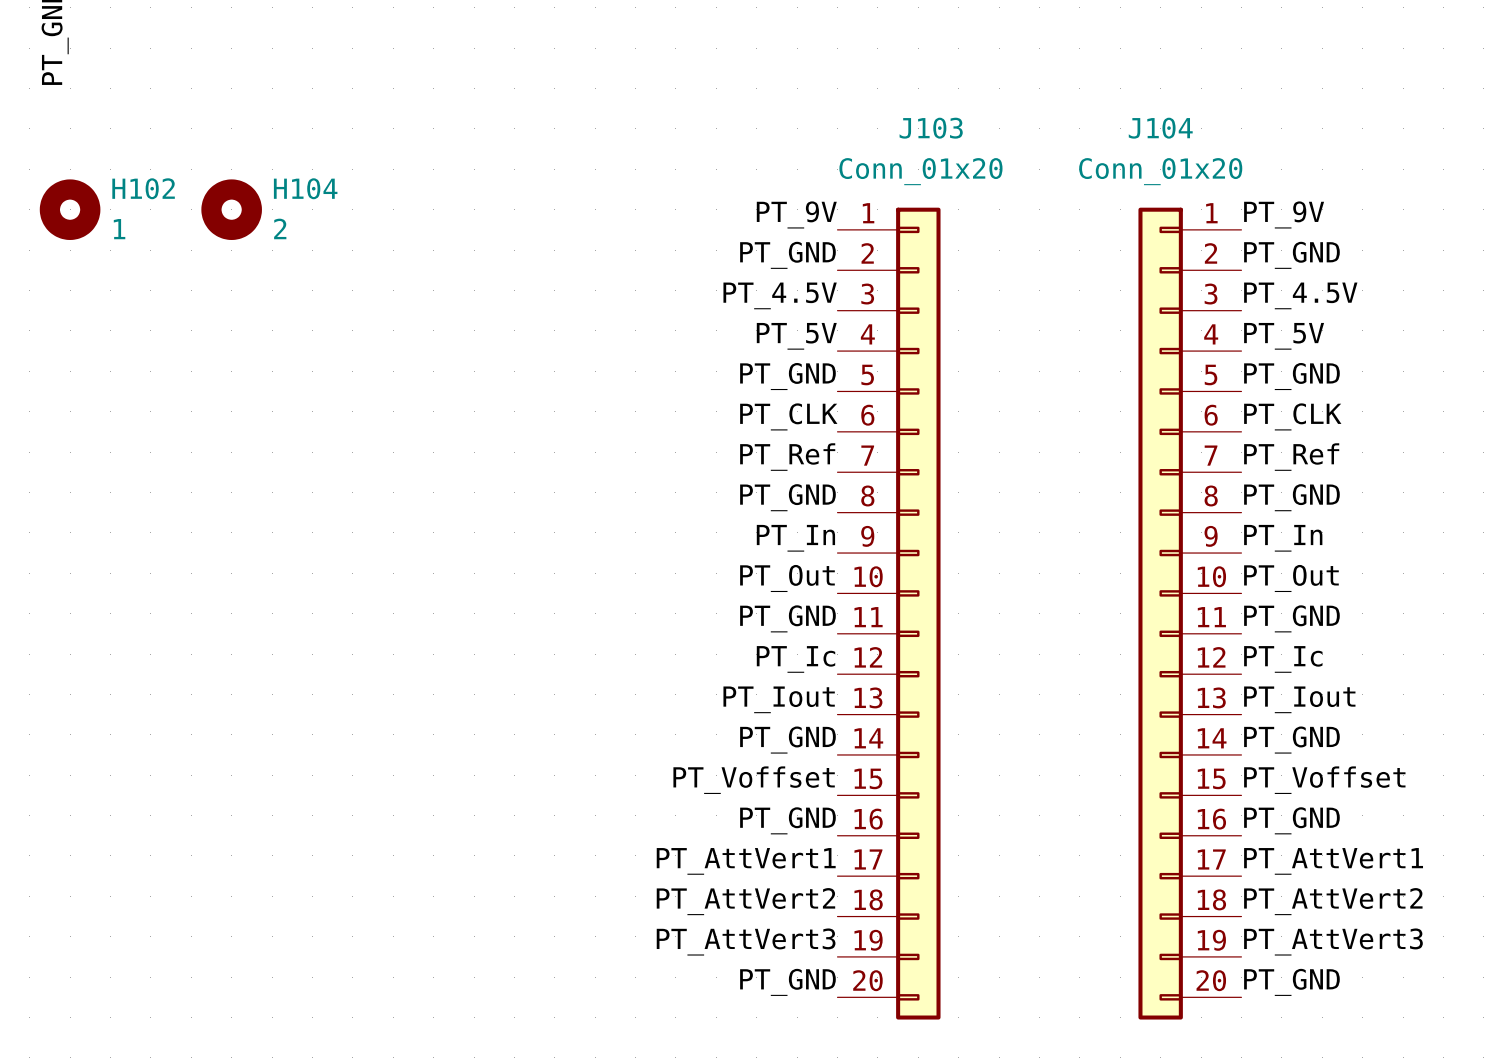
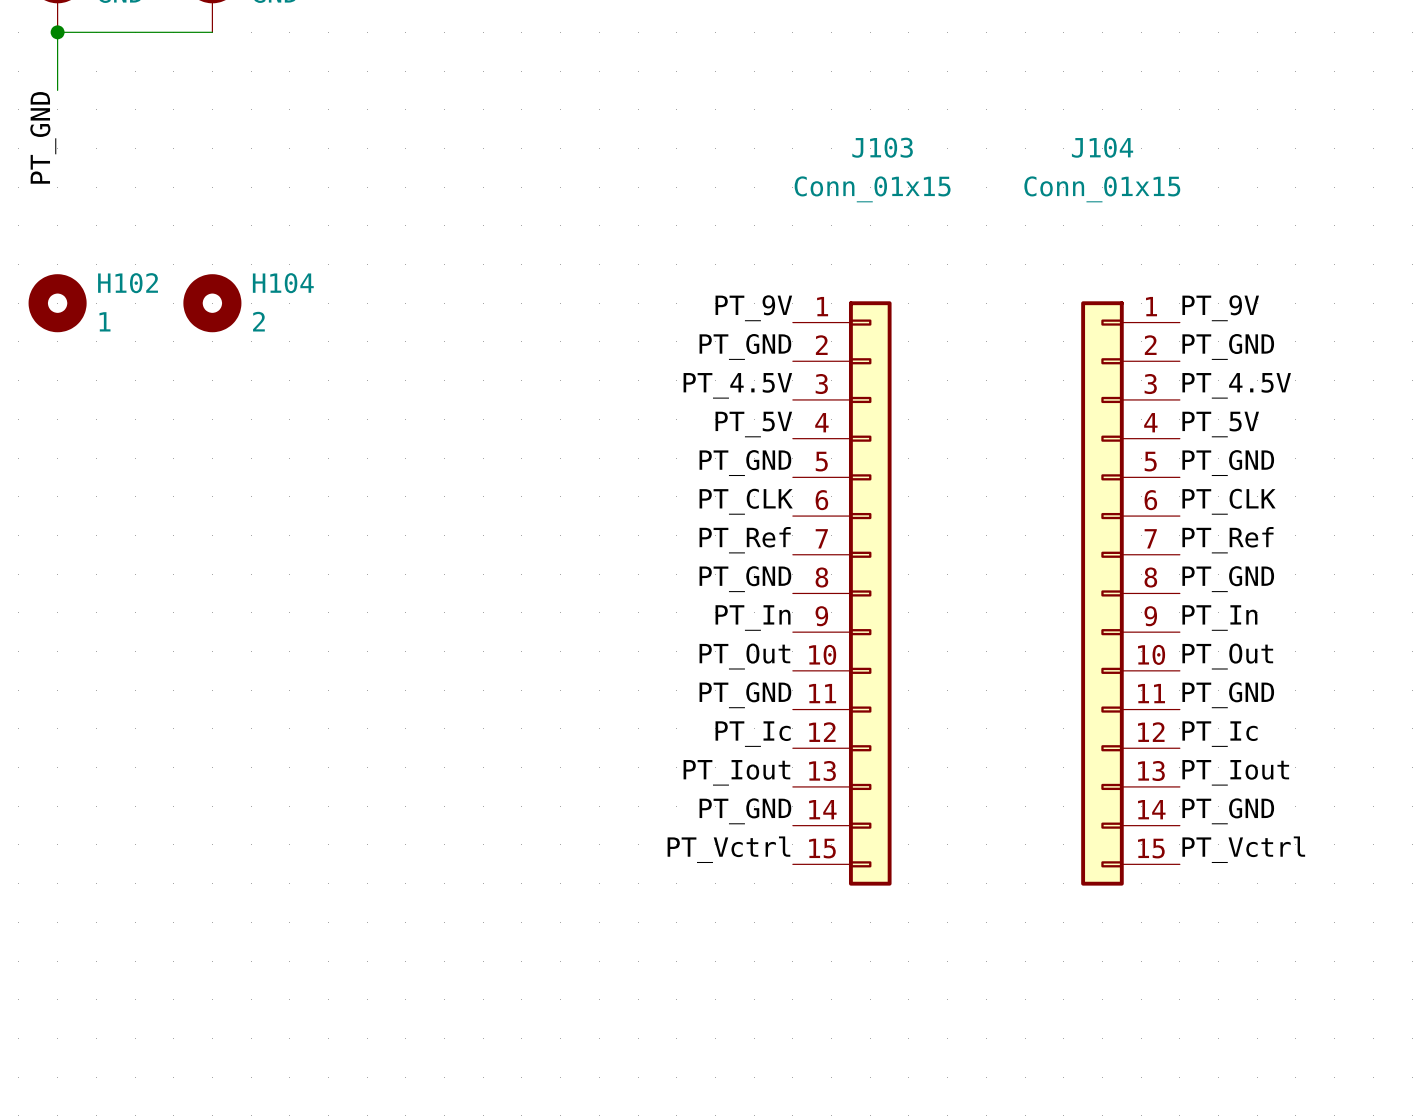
J103 value: Conn_01x20 (920, 171) -> Conn_01x15 (872, 189)
J104 value: Conn_01x20 (1160, 171) -> Conn_01x15 (1102, 189)
J103 symbol: [837, 207, 941, 1020] -> [792, 301, 892, 886]
J104 symbol: [1138, 207, 1242, 1020] -> [1081, 301, 1180, 886]
label: PT_Voffset (754, 780) -> PT_Vctrl (728, 849)
label: PT_Voffset (1324, 780) -> PT_Vctrl (1243, 849)
label: PT_GND (787, 820) -> none
label: PT_GND (1291, 820) -> none
label: PT_AttVert1 (746, 861) -> none
label: PT_AttVert1 (1333, 861) -> none
label: PT_AttVert2 (745, 901) -> none
label: PT_AttVert2 (1333, 901) -> none
label: PT_AttVert3 (746, 942) -> none
label: PT_AttVert3 (1333, 942) -> none
label: PT_GND (787, 982) -> none
label: PT_GND (1291, 982) -> none

